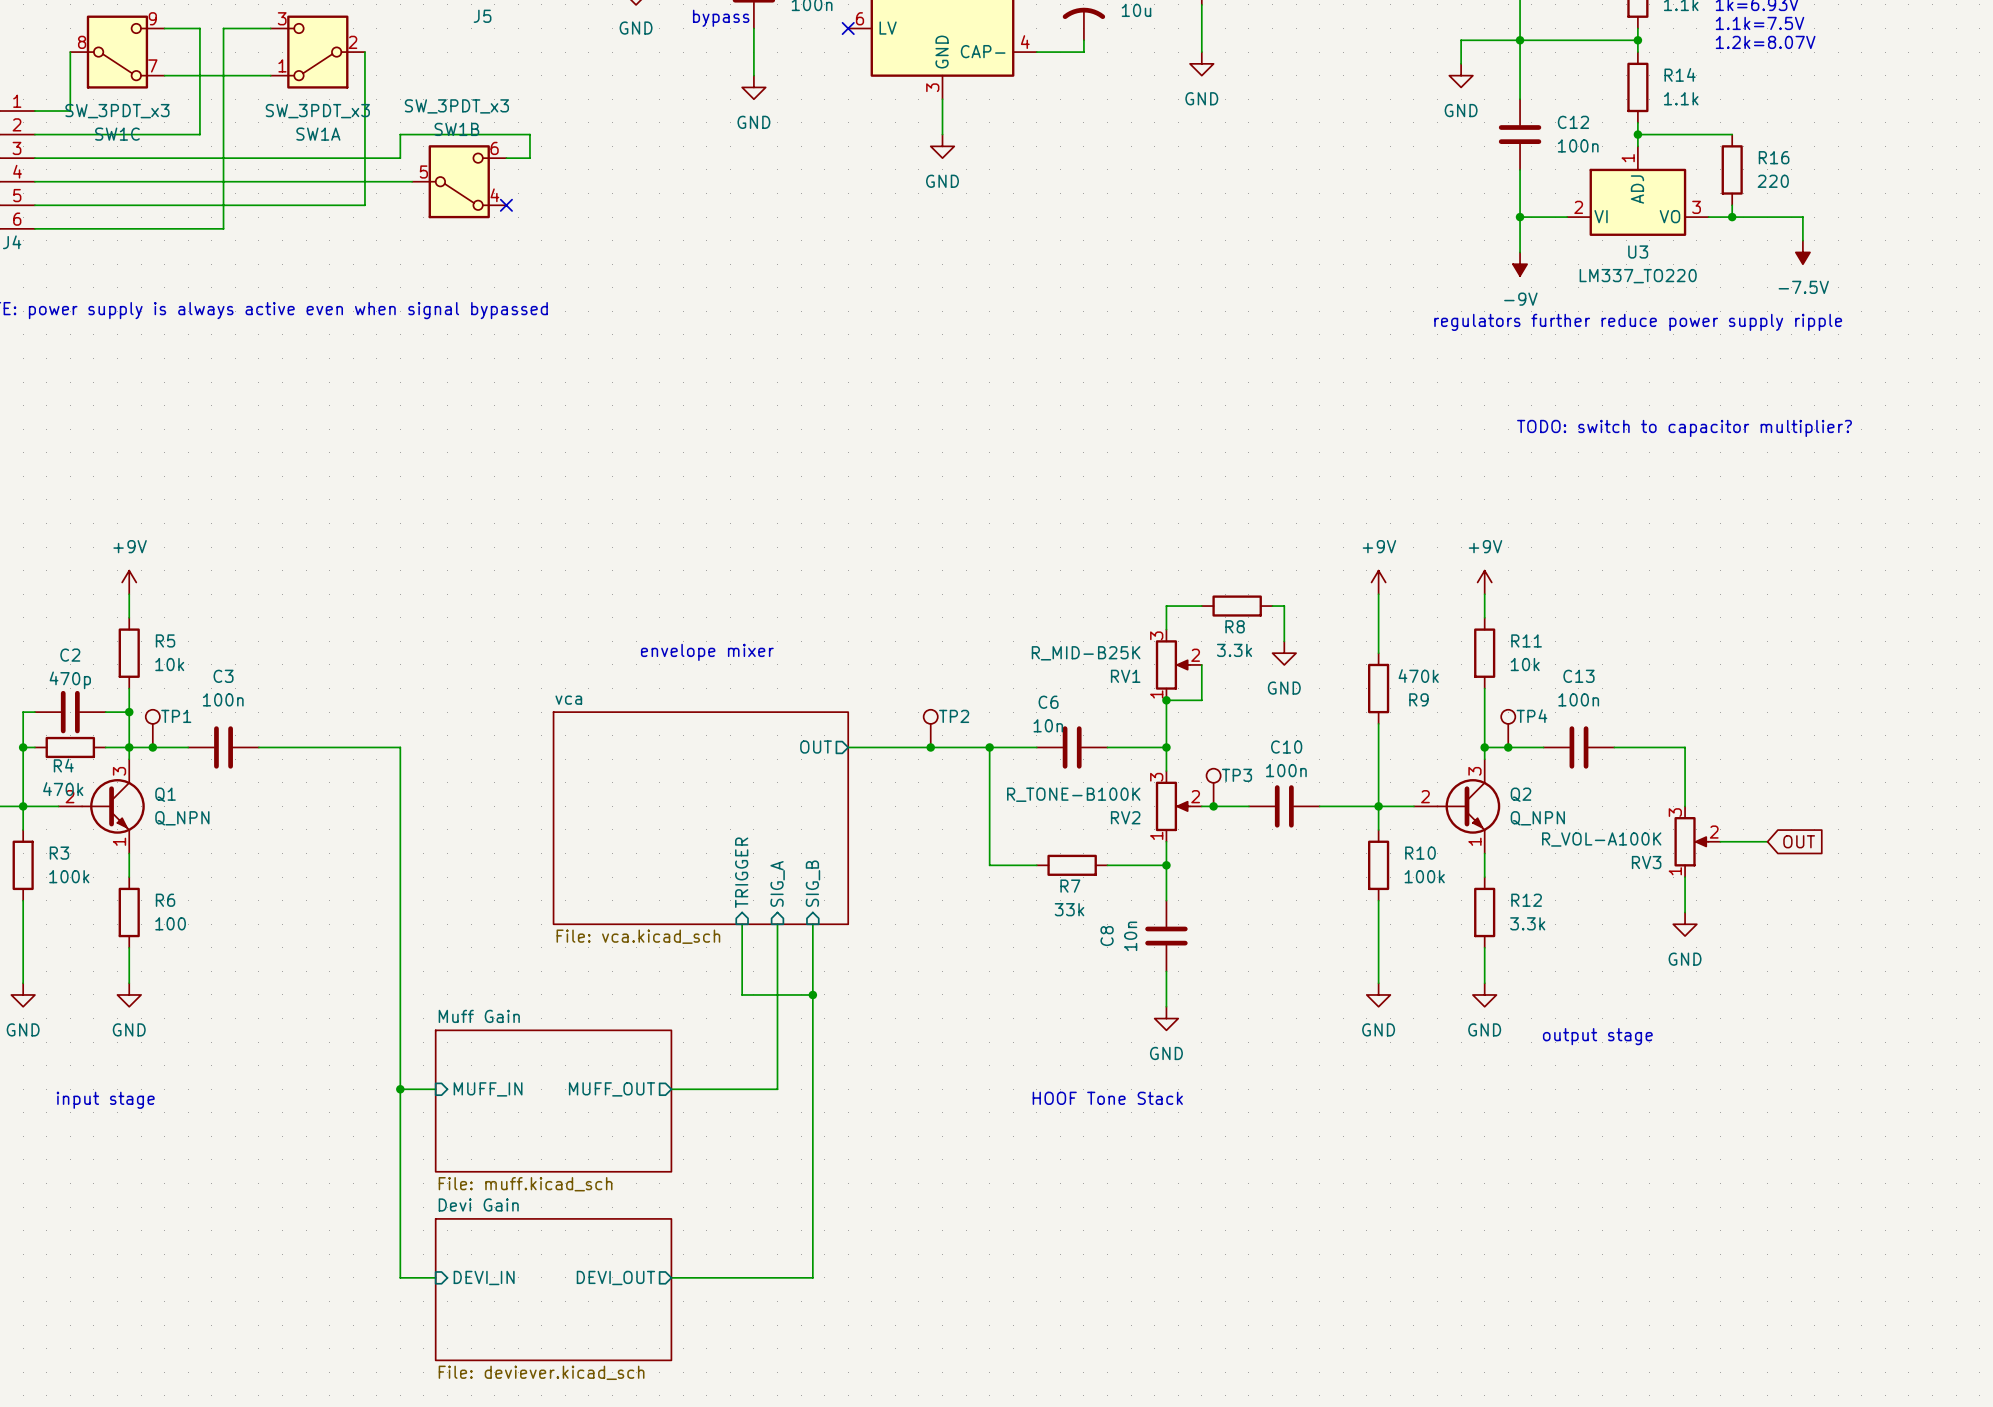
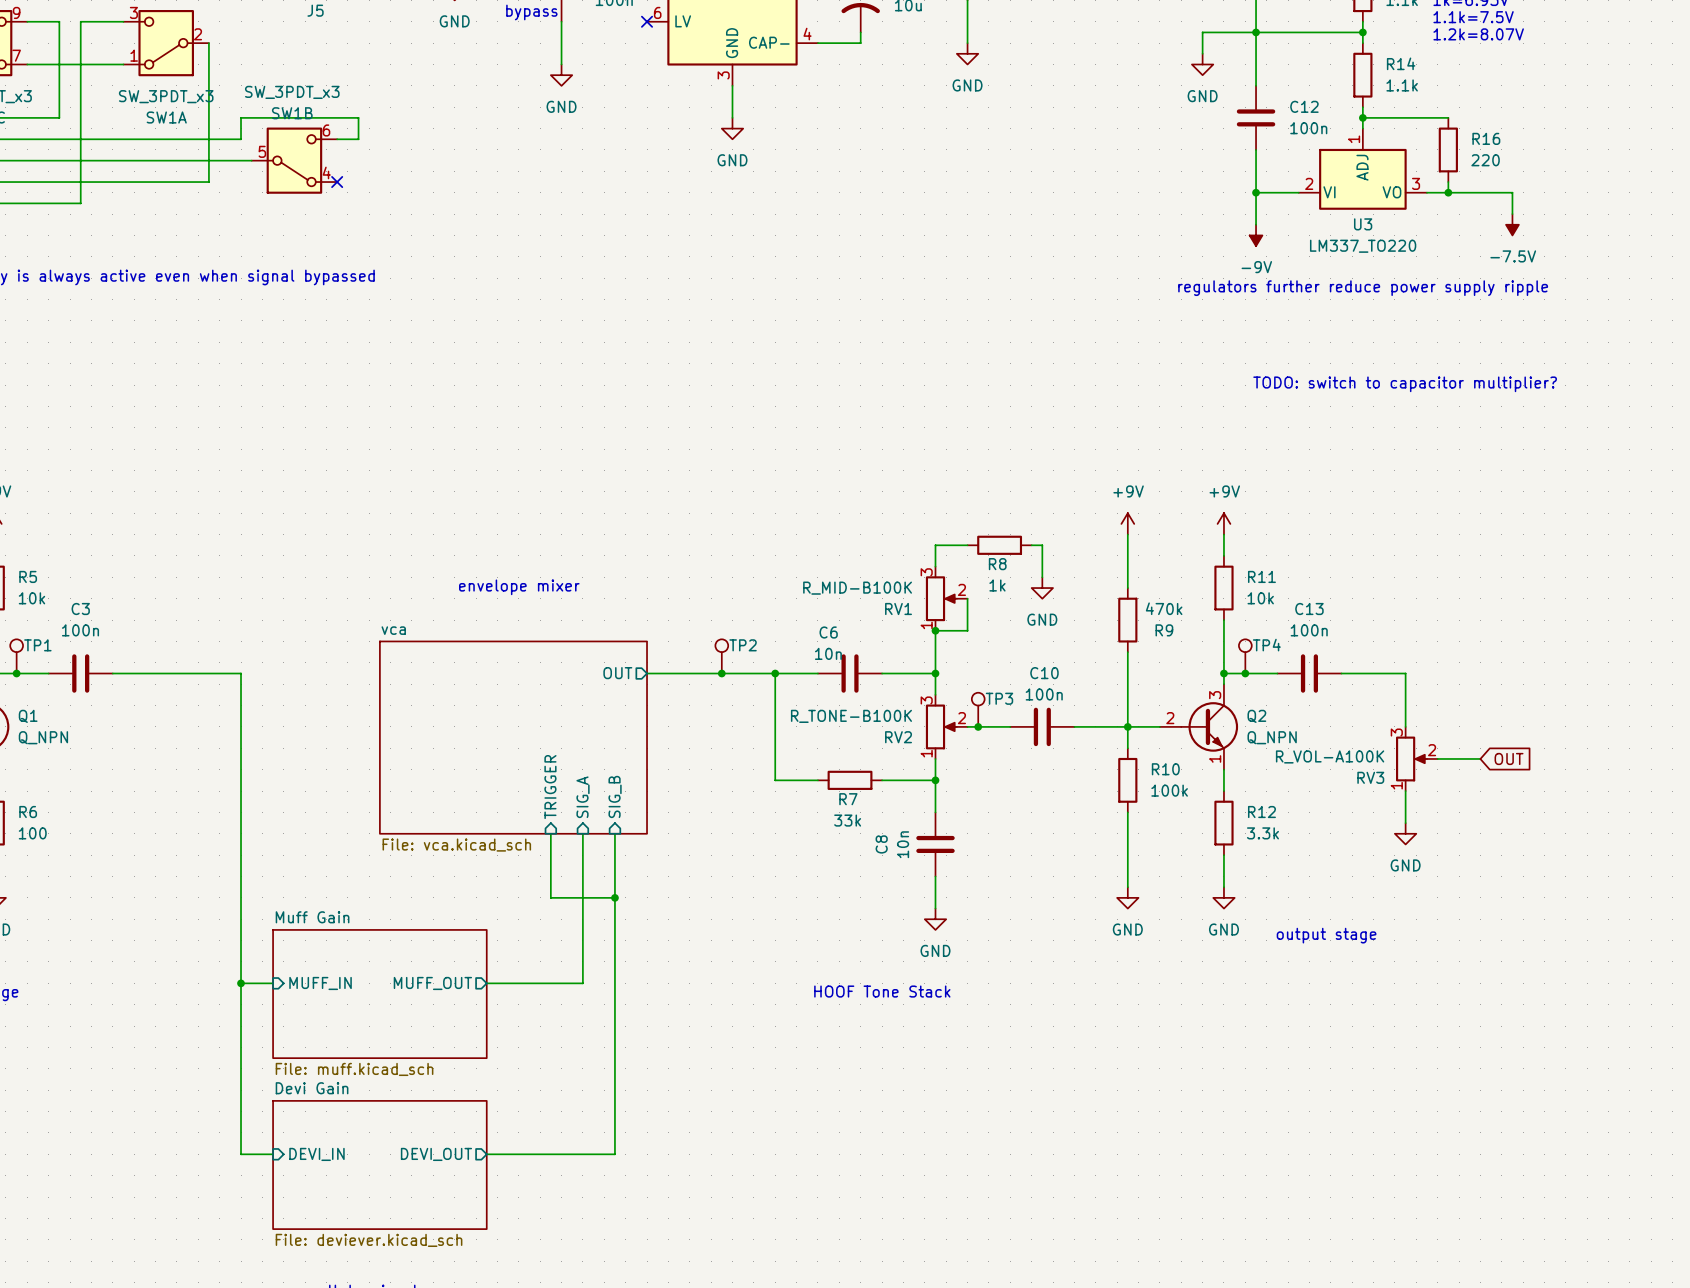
R8 value: 3.3k (1234, 650) -> 1k (997, 585)
RV1 value: R_MID-B25K (1086, 653) -> R_MID-B100K (857, 588)

